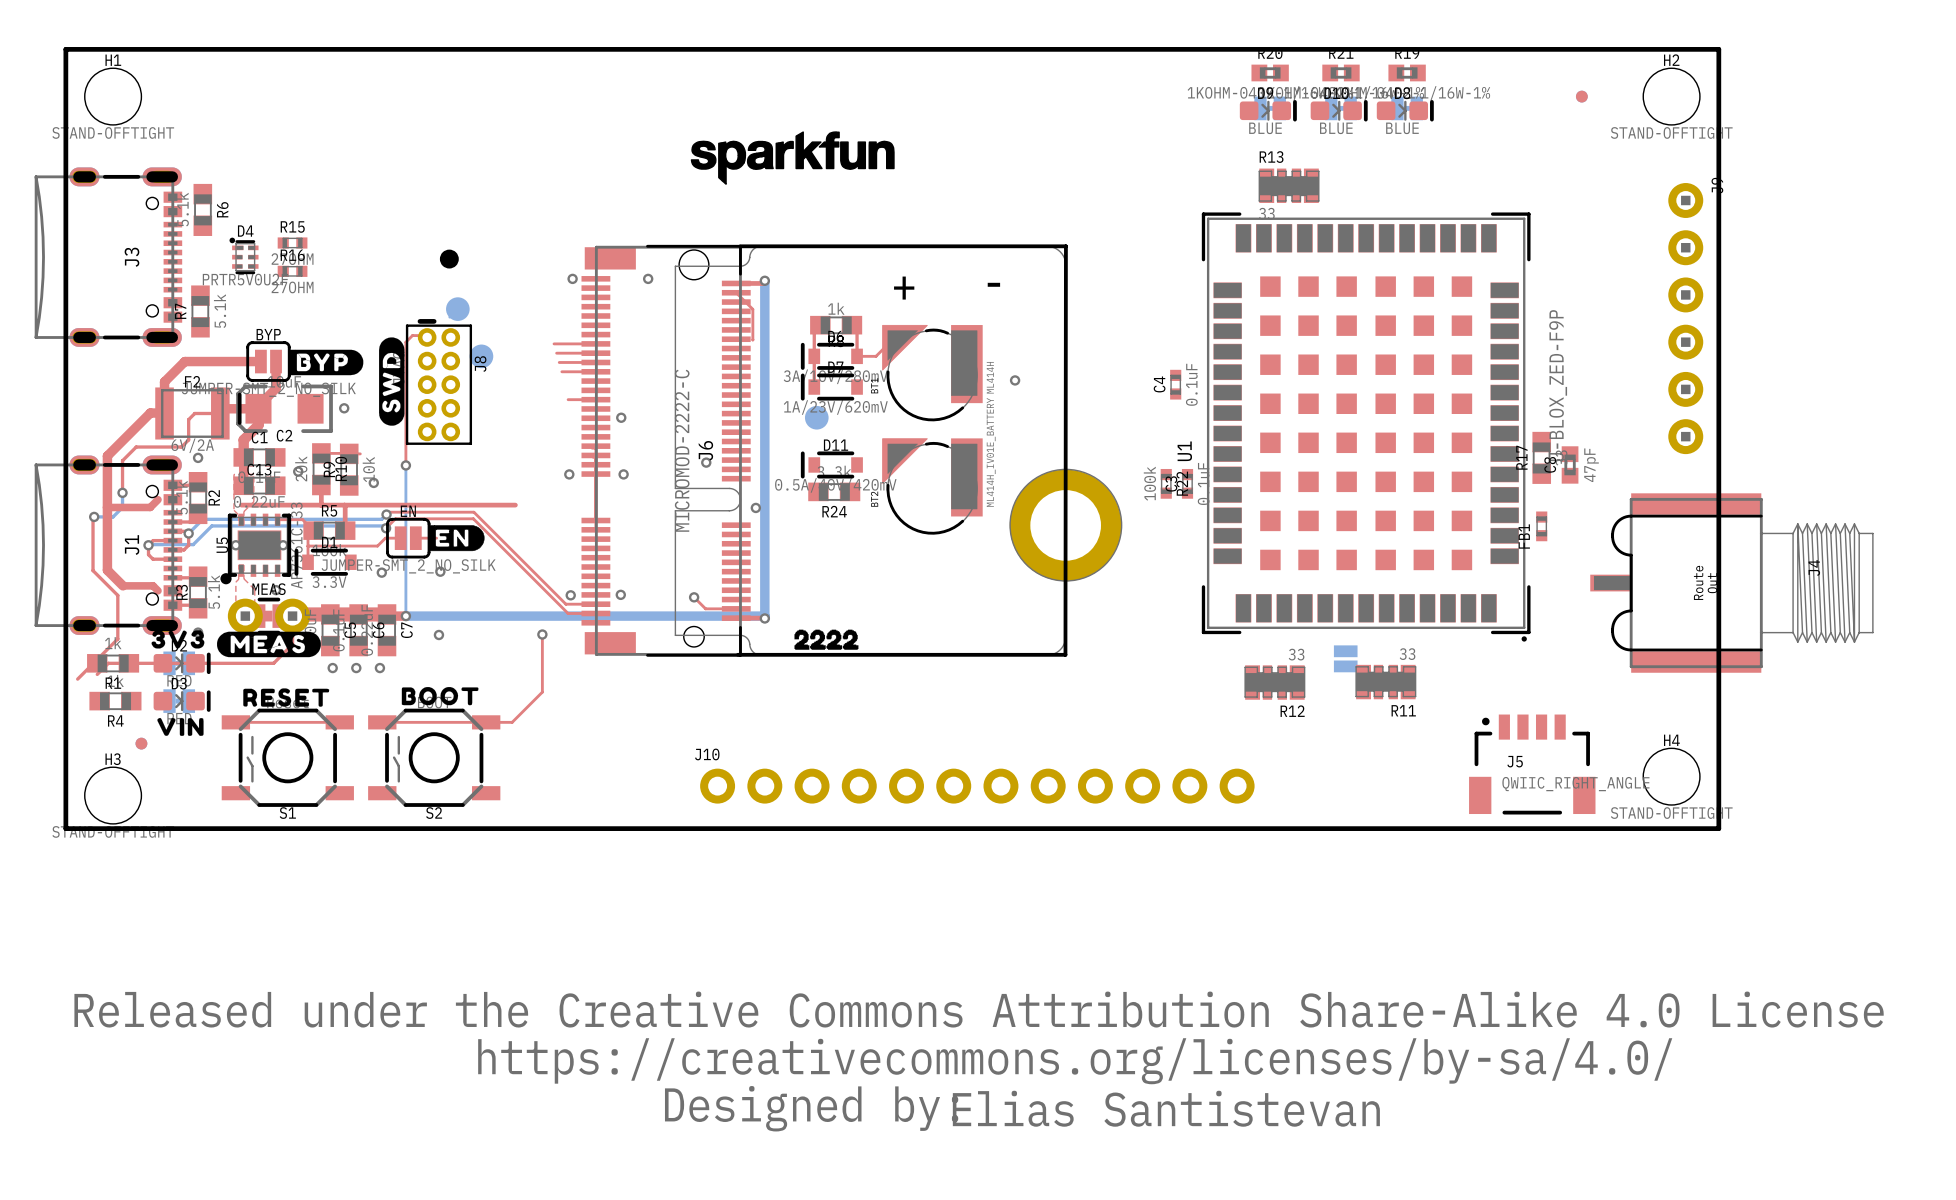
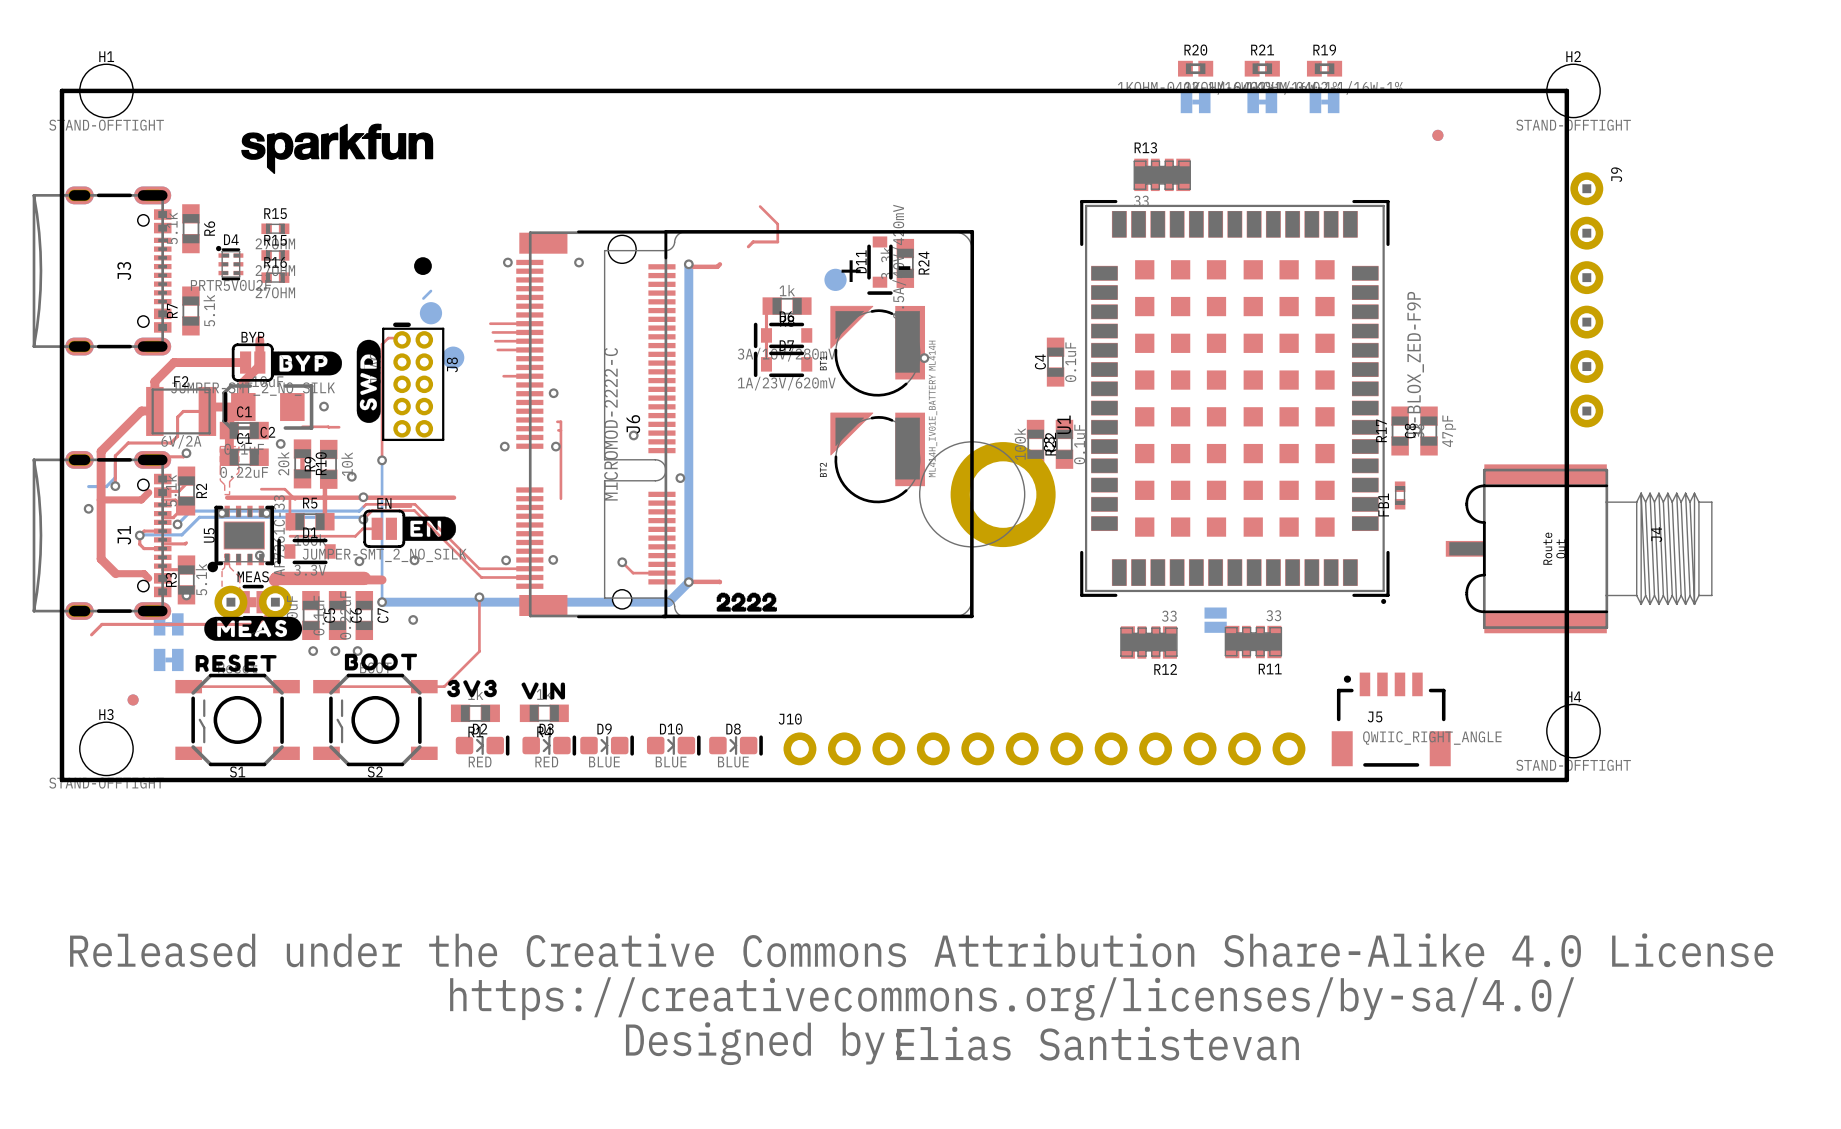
board edge: (65, 96) (65, 49) (1718, 49) (1718, 828) (1664, 828) -> (61, 90) (1566, 90) (1566, 779)
part position: (1581, 96) -> (1437, 135)
D9 position: (1268, 110) -> (607, 745)
D10 position: (1339, 110) -> (673, 745)
D8 position: (1405, 110) -> (736, 745)
drawing position: (792, 158) -> (337, 148)
R13 position: (1289, 185) -> (1162, 174)
R6 position: (202, 209) -> (190, 228)
top track: none -> (760, 206) (777, 224) (777, 241) (753, 241) (748, 246)
line: none -> (665, 231) (696, 231)
line: (1032, 246) (1065, 246) (1065, 654) (1032, 654) -> (972, 231) (971, 616)
D4 position: (244, 255) -> (229, 263)
R16 name: R16 (292, 255) -> R15 (275, 240)
J3 position: (108, 257) -> (102, 270)
drawing position: (449, 259) -> (422, 266)
via: none -> (507, 262)
via: (572, 278) -> none
via: none -> (579, 262)
via: (648, 278) -> none
bottom track: (764, 280) (764, 618) -> none
via position: (764, 280) -> (688, 264)
text position: - (993, 284) -> - (904, 268)
top track: (736, 292) (752, 309) (752, 339) -> none
R16: none -> 27OHM (275, 277)
part: (457, 309) -> none
R7 position: (200, 311) -> (190, 310)
top track: (851, 325) (857, 330) (857, 356) (875, 356) (894, 337) -> none
part: none -> (430, 313)
top track: (427, 337) (425, 335) (412, 335) (405, 342) (405, 365) -> (402, 339) (400, 338) (388, 338) (382, 344)
top track: (562, 343) (595, 343) -> (490, 323) (521, 323)
top track: (562, 353) (595, 353) -> (492, 332) (523, 332)
part: (481, 356) -> none
top track: (260, 361) (184, 361) (164, 381) (164, 405) -> (245, 362) (174, 362) (154, 381)
BYP position: (268, 361) -> (252, 362)
drawing position: (326, 362) -> (307, 363)
top track: (562, 362) (595, 362) -> (495, 341) (526, 341)
C4 footprint: [1170, 369, 1182, 400] -> [1046, 337, 1065, 387]
top track: (562, 371) (595, 371) -> (497, 349) (528, 349)
part: none -> (453, 357)
via position: (1015, 380) -> (924, 358)
drawing position: (391, 381) -> (368, 381)
J8 position: (438, 381) -> (413, 381)
top track: (568, 399) (595, 399) -> (503, 376) (529, 376)
top track: (258, 408) (225, 408) (220, 413) (194, 413) (188, 419) (188, 439) (181, 447) (136, 447) (122, 460) (122, 484) -> (243, 407) (211, 407) (207, 411) (183, 411) (177, 417) (177, 436) (170, 443) (128, 443) (115, 455)
C2 position: (284, 408) -> (267, 407)
via position: (344, 408) -> (324, 406)
top track: (164, 413) (150, 413) (107, 456) (107, 479) -> (154, 411) (141, 411) (101, 451)
F2 position: (192, 413) -> (181, 411)
via: none -> (553, 393)
via: (621, 417) -> none
part position: (816, 417) -> (835, 279)
U1 position: (1366, 427) -> (1234, 401)
C8 footprint: [1561, 446, 1579, 484] -> [1420, 406, 1438, 456]
J6 position: (851, 450) -> (770, 424)
via position: (198, 457) -> (186, 453)
R17 position: (1541, 457) -> (1400, 431)
via: none -> (633, 435)
via: (706, 462) -> none
D11 rotation: 0° (831, 464) -> 90° counterclockwise (879, 265)
D11 position: (831, 464) -> (879, 265)
top track: none -> (382, 438) (382, 460)
bottom track: (405, 465) (405, 489) -> none
via: (405, 465) -> none
R22 footprint: [1160, 468, 1172, 499] -> [1026, 419, 1045, 469]
C3 footprint: [1181, 468, 1194, 499] -> [1055, 419, 1074, 469]
C13 name: C13 (259, 469) -> C1 (244, 438)
R10 position: (321, 469) -> (302, 463)
R9 position: (349, 469) -> (328, 464)
via: none -> (504, 446)
via: (569, 474) -> none
via: none -> (555, 446)
via: (623, 474) -> none
via: (373, 482) -> none
via: none -> (382, 460)
R24 rotation: 0° (834, 491) -> 90° clockwise (905, 263)
R24 position: (834, 491) -> (905, 263)
top track: none -> (115, 463) (115, 486)
via: (122, 492) -> none
R2 position: (198, 498) -> (186, 491)
top track: (158, 499) (150, 507) (107, 507) -> (148, 492) (141, 499) (101, 499)
top track: (241, 505) (515, 505) -> none
via: none -> (351, 476)
via: none -> (680, 478)
via: (755, 507) -> none
top track: (386, 514) (388, 512) (473, 512) (565, 604) (595, 604) -> none
bottom track: (386, 514) (381, 519) (202, 519) (188, 533) -> (363, 506) (359, 511) (190, 511) (177, 524)
via: (386, 514) -> none
top track: (94, 516) (93, 570) (117, 595) (117, 638) (77, 679) -> none
via: (94, 516) -> none
via: none -> (115, 486)
FB1 position: (1541, 526) -> (1400, 495)
top track: none -> (227, 497) (454, 497)
top track: (386, 528) (395, 518) (473, 518) (568, 613) (595, 613) -> none
bottom track: (386, 528) (383, 525) (211, 525) (193, 544) (148, 545) -> (363, 519) (361, 517) (199, 517) (181, 534) (139, 535)
R5 position: (329, 530) -> (310, 521)
top track: none -> (324, 499) (324, 521)
via: (188, 533) -> none
top track: none -> (363, 506) (366, 504) (414, 504) (479, 568) (529, 568)
top track: (400, 538) (385, 538) (377, 546) (308, 546) -> (377, 528) (362, 528) (355, 536) (290, 536)
EN position: (408, 538) -> (384, 528)
drawing position: (456, 538) -> (429, 528)
via: none -> (88, 508)
top track: (172, 540) (153, 540) (148, 545) (148, 554) (153, 559) (172, 559) -> (162, 531) (144, 531) (139, 535) (139, 544) (144, 548) (162, 548)
J1 position: (108, 545) -> (102, 535)
via: (148, 545) -> none
U5 position: (255, 548) -> (240, 538)
top track: none -> (363, 519) (372, 510) (414, 510) (481, 577) (529, 577)
via: none -> (363, 519)
via: none -> (177, 524)
D1 position: (325, 562) -> (306, 551)
via: none -> (139, 535)
top track: (107, 570) (123, 585) (153, 585) (158, 590) -> (101, 536) (101, 559) (115, 573) (144, 573) (148, 578)
via: (440, 571) -> none
via: (381, 572) -> none
J4 position: (1731, 583) -> (1579, 548)
R3 position: (198, 592) -> (186, 579)
via: none -> (553, 559)
via: (620, 594) -> none
via: none -> (414, 560)
via: none -> (506, 560)
via: (570, 595) -> none
via: none -> (359, 561)
via: none -> (622, 562)
top track: (694, 597) (705, 608) (736, 608) -> (622, 562) (633, 573) (661, 573)
via: (694, 597) -> none
top zone outline: (235, 605) (235, 582) (238, 579) (238, 565) (243, 565) (243, 578) (254, 589) (254, 613) -> (222, 570) (224, 567) (224, 554) (229, 554) (229, 567) (239, 577)
MEAS position: (268, 616) -> (253, 602)
bottom track: (405, 616) (764, 616) -> (382, 579) (382, 602) (668, 602) (688, 582) (688, 264)
via: (405, 616) -> none
via: none -> (688, 582)
via: (764, 618) -> none
C5 position: (330, 630) -> (310, 615)
C6 position: (358, 630) -> (337, 615)
C7 position: (387, 630) -> (364, 615)
via: (438, 634) -> none
top track: none -> (479, 597) (479, 651) (444, 686) (326, 686)
via: none -> (479, 597)
top track: (542, 634) (542, 692) (512, 722) (382, 722) -> none
via: (542, 634) -> none
drawing position: (178, 639) -> (472, 688)
via: none -> (382, 602)
drawing position: (826, 639) -> (746, 602)
drawing position: (268, 644) -> (253, 628)
line: none -> (663, 616) (694, 616)
via: none -> (413, 619)
part position: (1345, 658) -> (1215, 620)
R1 position: (113, 663) -> (475, 713)
D2 position: (182, 663) -> (482, 745)
via: (332, 668) -> none
via: (356, 668) -> none
via: (379, 668) -> none
R12 position: (1274, 682) -> (1148, 642)
R11 position: (1385, 682) -> (1253, 642)
via: none -> (313, 651)
via: none -> (335, 651)
via: none -> (357, 651)
drawing position: (440, 696) -> (380, 661)
drawing position: (286, 697) -> (236, 663)
R4 position: (115, 701) -> (544, 713)
D3 position: (182, 701) -> (549, 745)
top track: (235, 722) (339, 722) -> (188, 686) (286, 686)
drawing position: (180, 726) -> (543, 690)
S1 position: (287, 757) -> (237, 719)
S2 position: (434, 757) -> (375, 719)
J5 position: (1532, 764) -> (1391, 719)
J10 position: (977, 786) -> (1044, 748)

